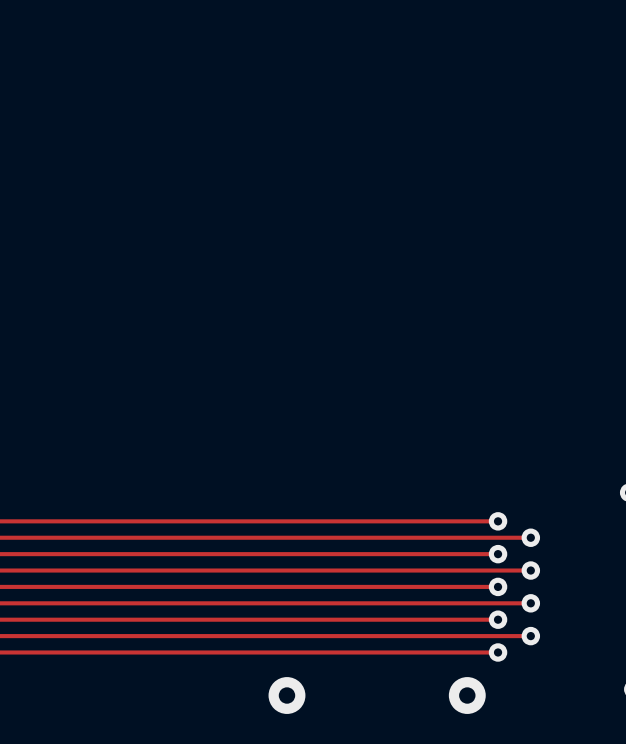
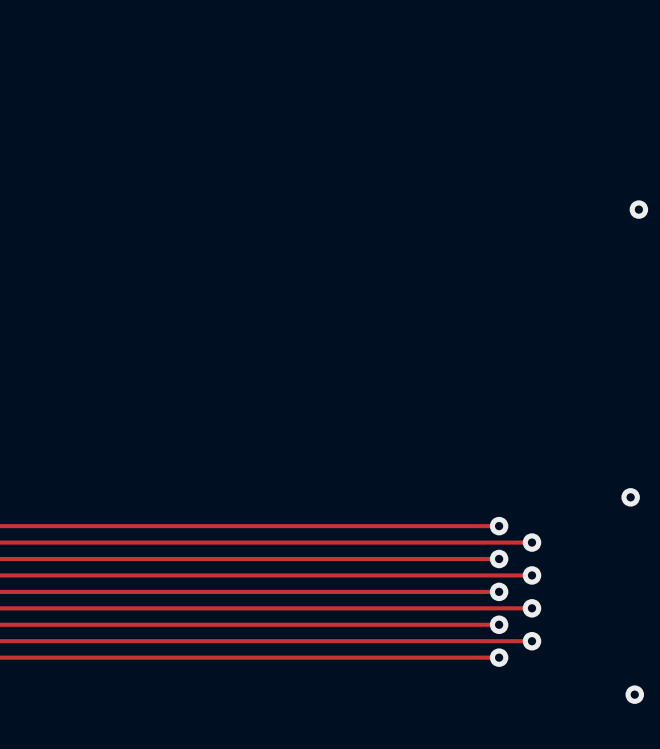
via: (286, 695) -> none
via: (467, 695) -> none

